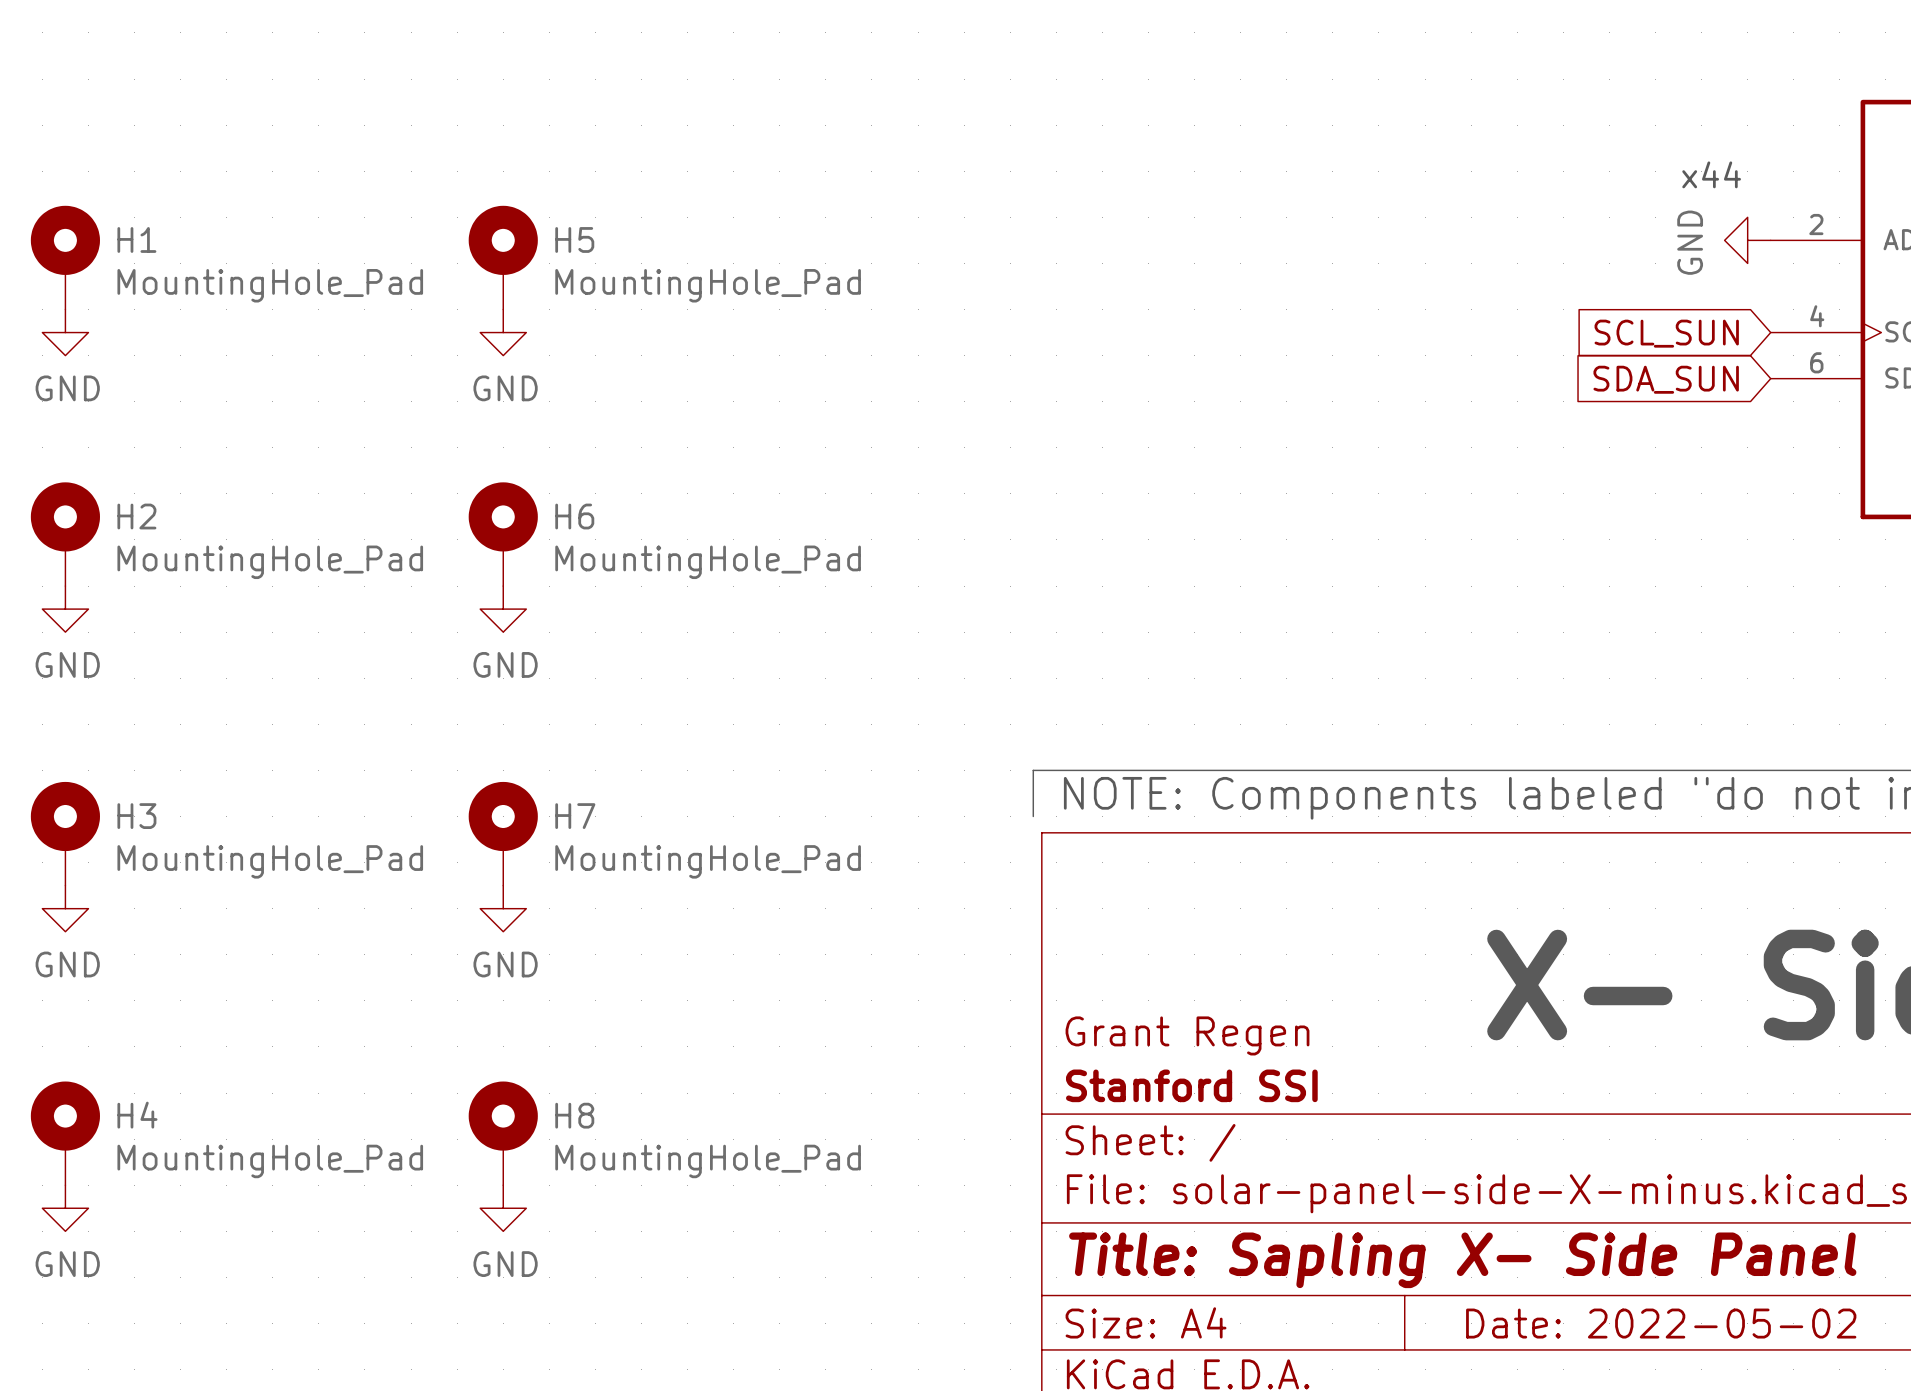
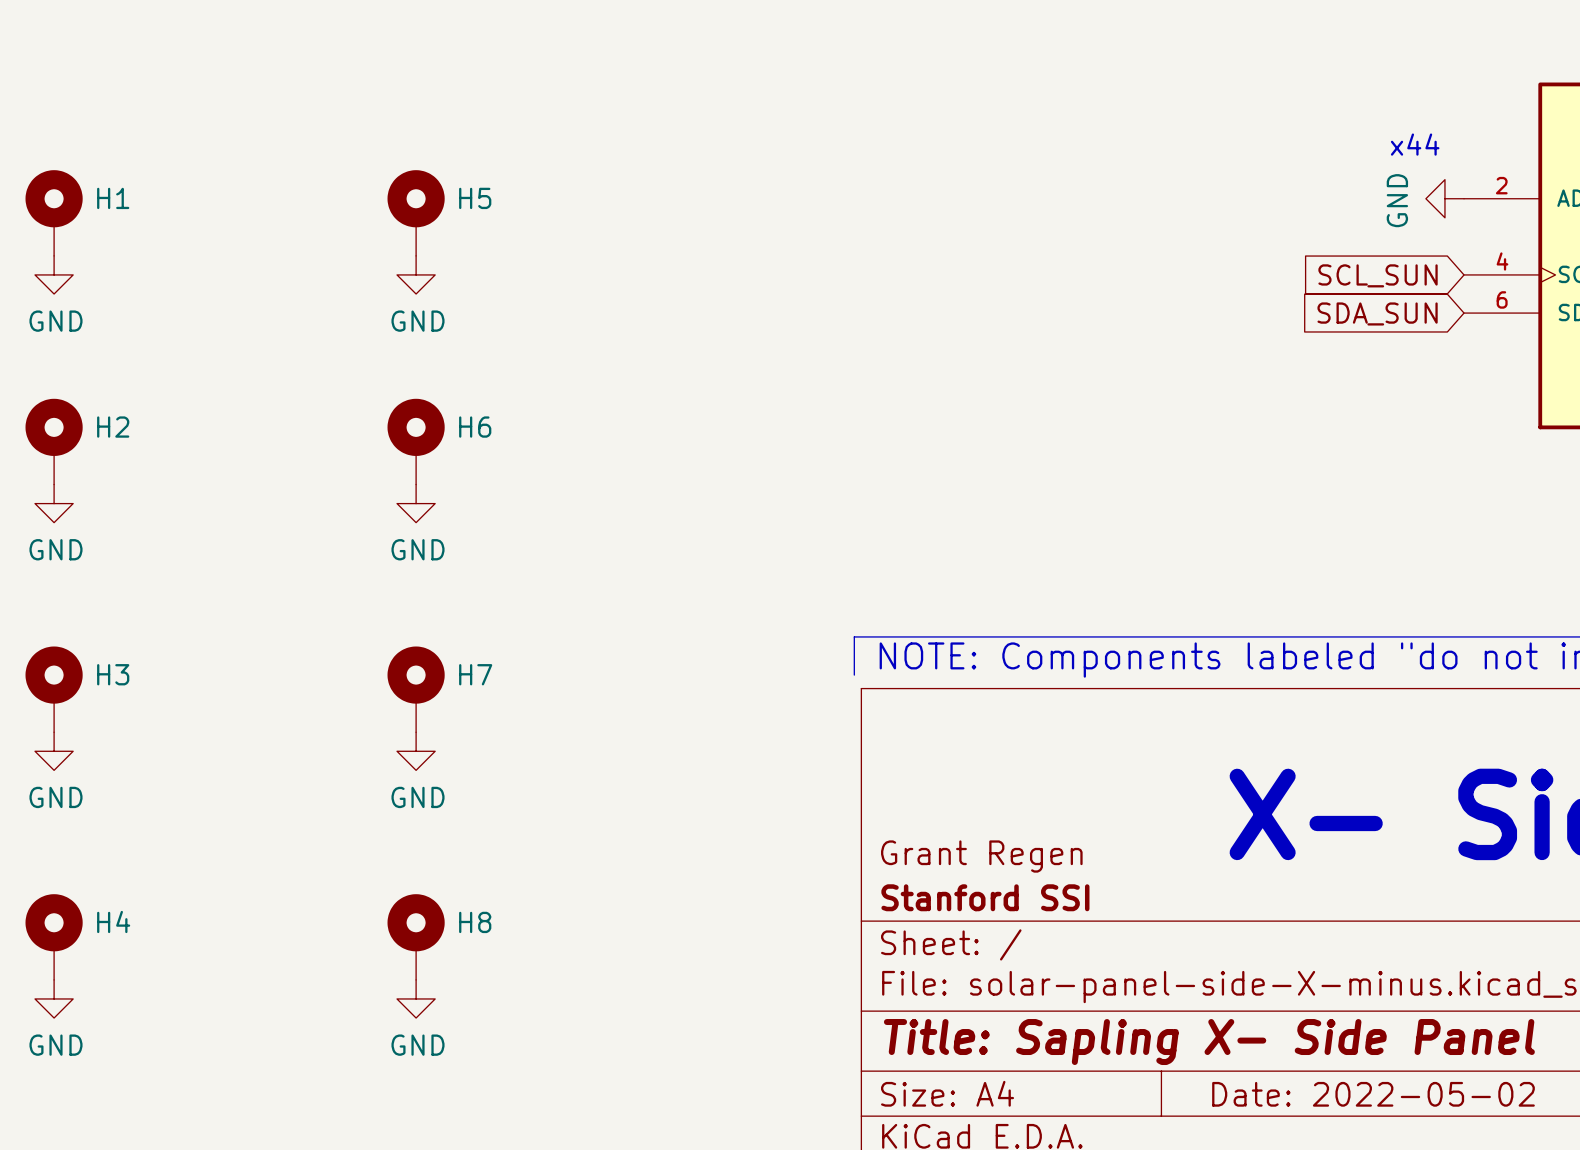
H1 value: MountingHole_Pad (270, 285) -> none
H5 value: MountingHole_Pad (708, 285) -> none
H2 value: MountingHole_Pad (270, 562) -> none
H6 value: MountingHole_Pad (708, 562) -> none
H3 value: MountingHole_Pad (270, 861) -> none
H7 value: MountingHole_Pad (708, 861) -> none
H4 value: MountingHole_Pad (270, 1161) -> none
H8 value: MountingHole_Pad (708, 1161) -> none

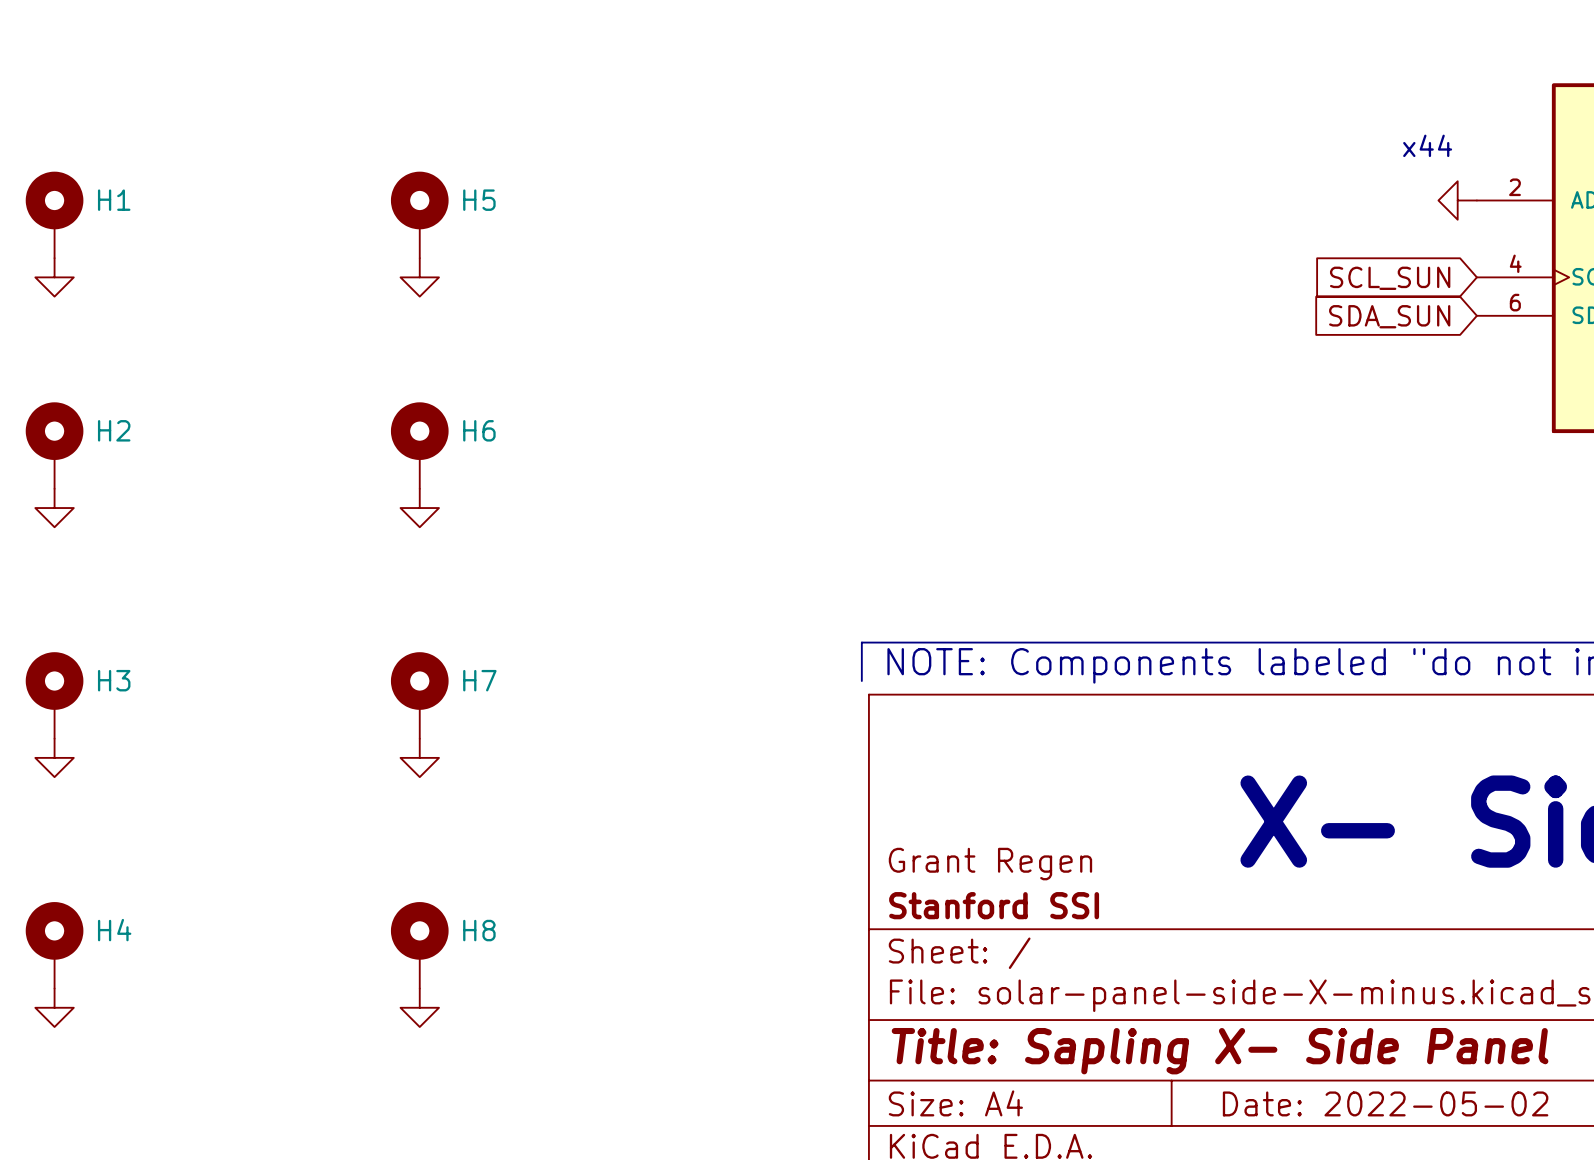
power symbol text: GND (1397, 200) -> none
power symbol text: GND (55, 321) -> none
power symbol text: GND (418, 321) -> none
power symbol text: GND (55, 549) -> none
power symbol text: GND (418, 549) -> none
power symbol text: GND (55, 797) -> none
power symbol text: GND (418, 797) -> none
power symbol text: GND (55, 1045) -> none
power symbol text: GND (418, 1045) -> none

